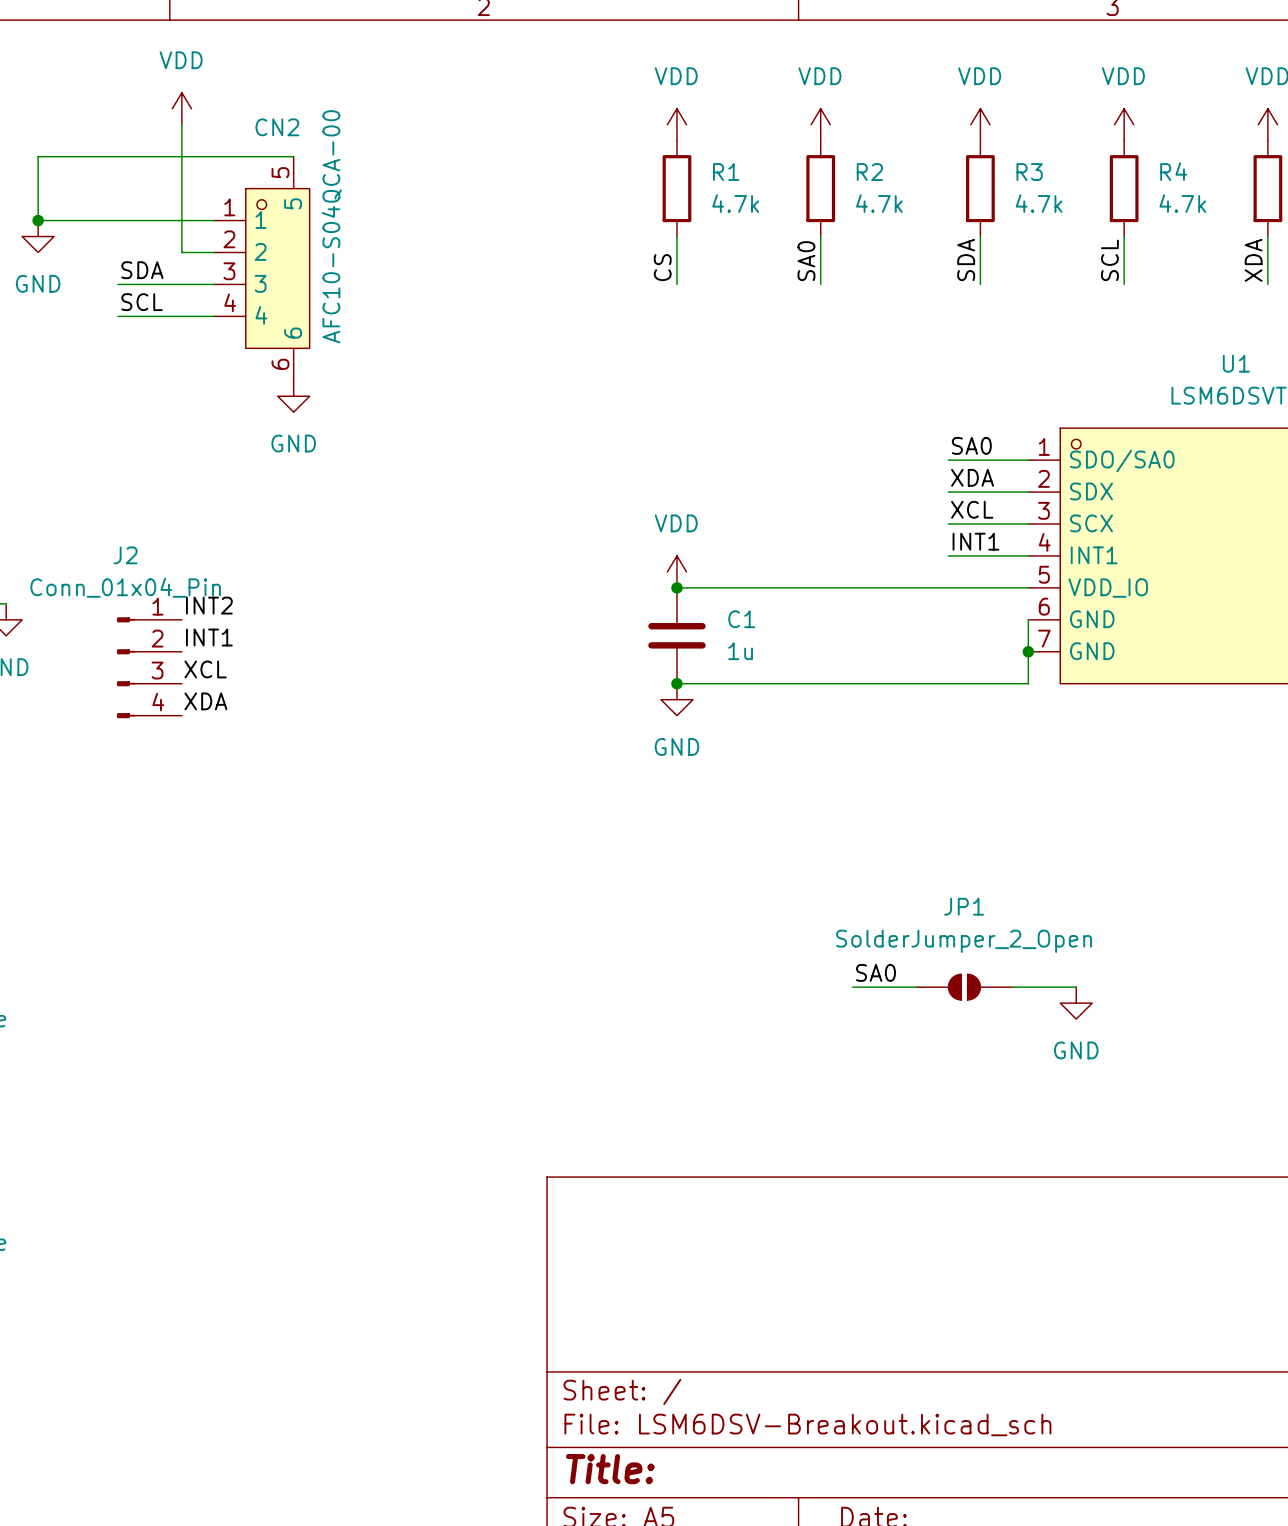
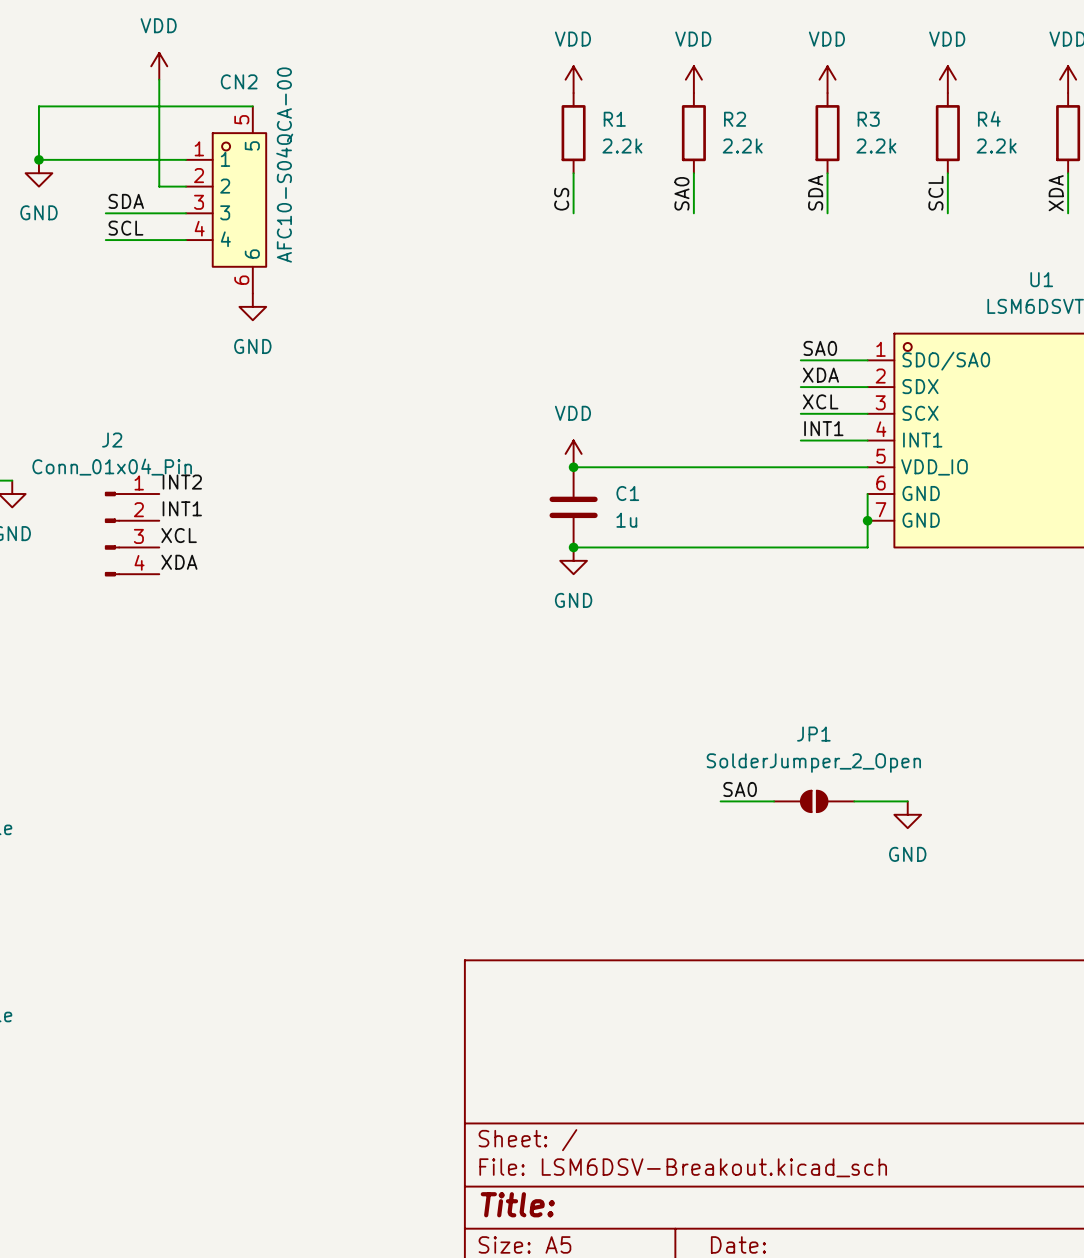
R1 value: 4.7k (735, 203) -> 2.2k (622, 146)
R2 value: 4.7k (879, 203) -> 2.2k (742, 146)
R3 value: 4.7k (1039, 203) -> 2.2k (876, 146)
R4 value: 4.7k (1182, 203) -> 2.2k (996, 146)

